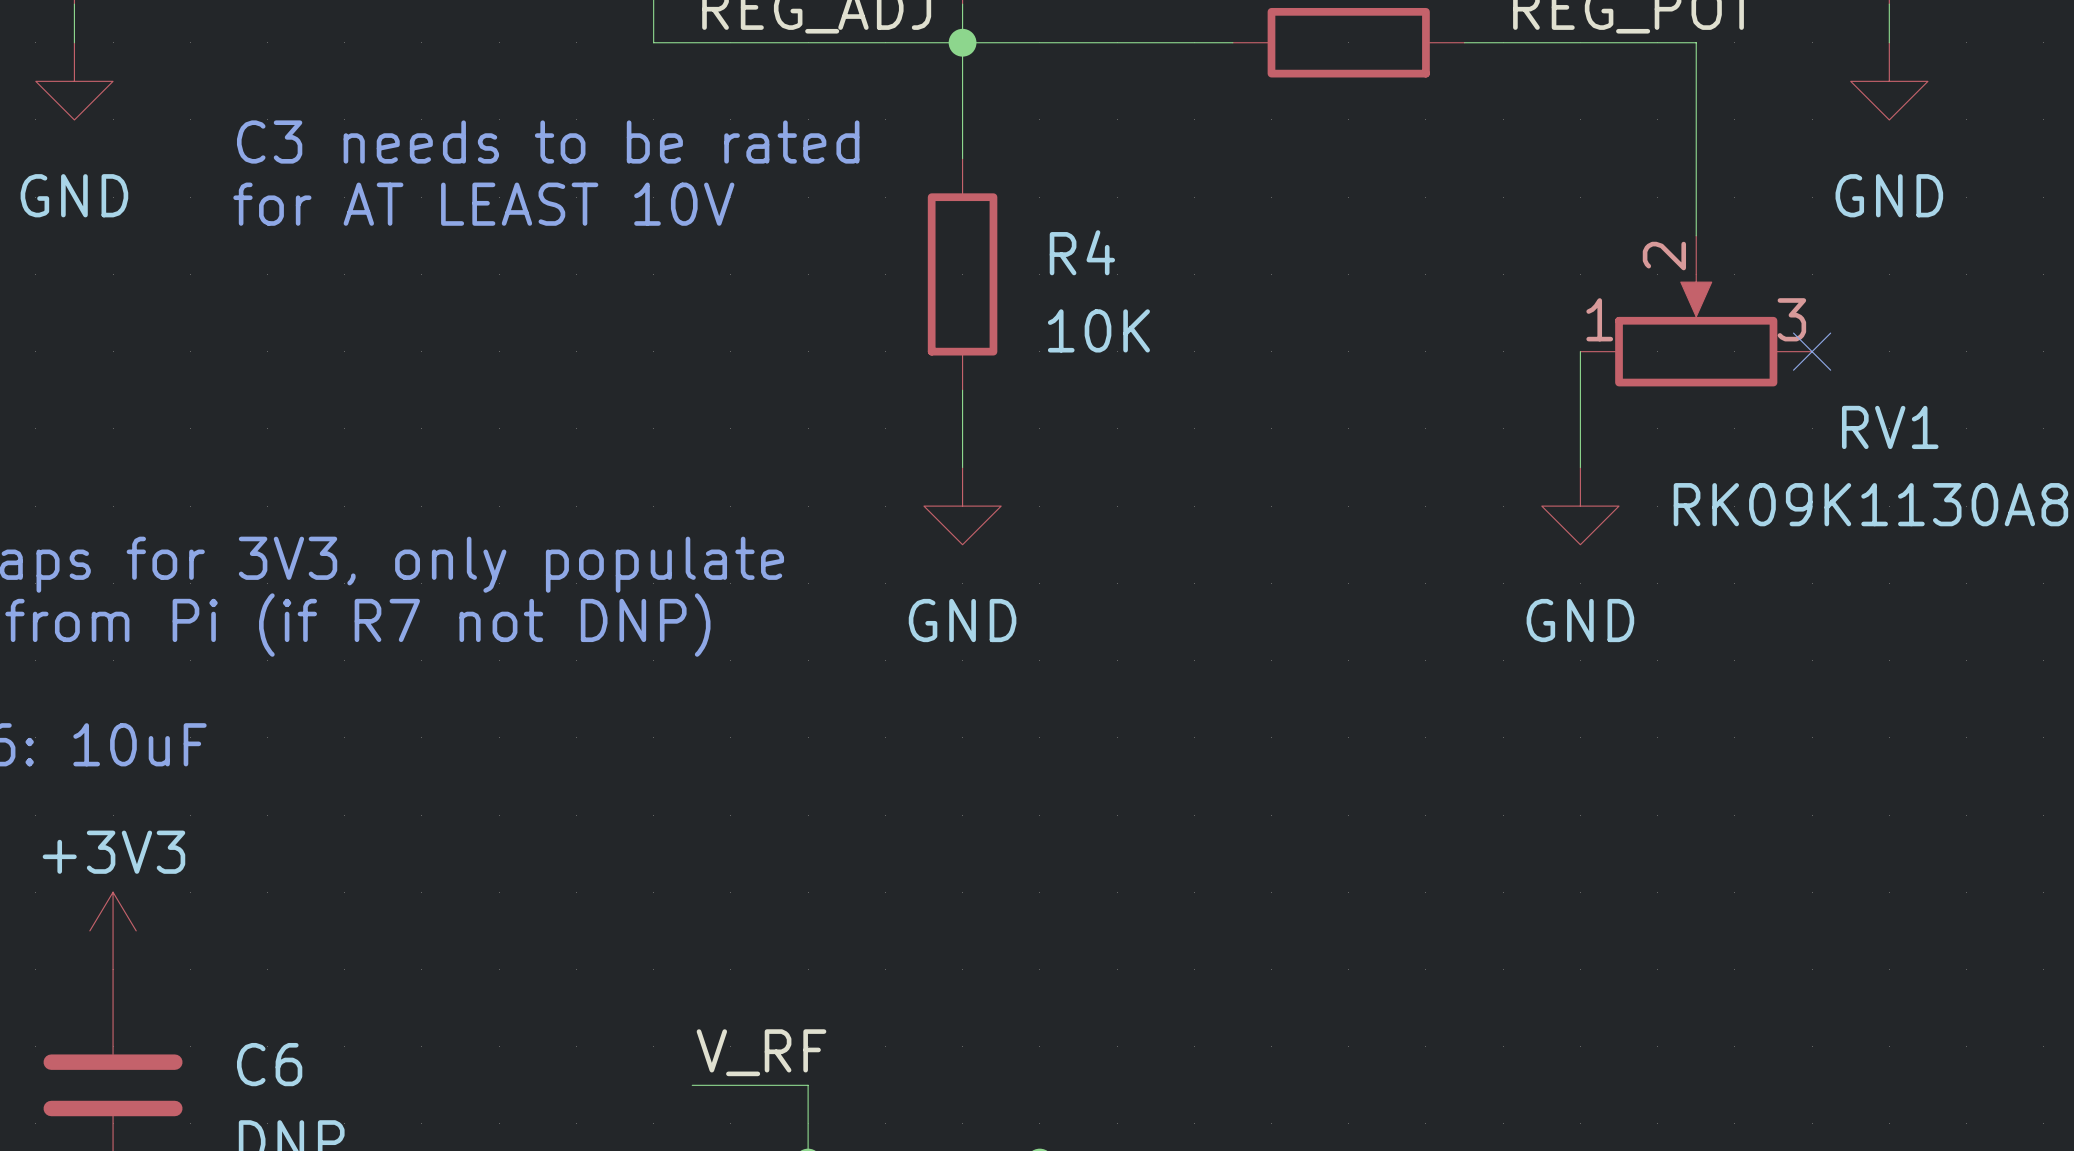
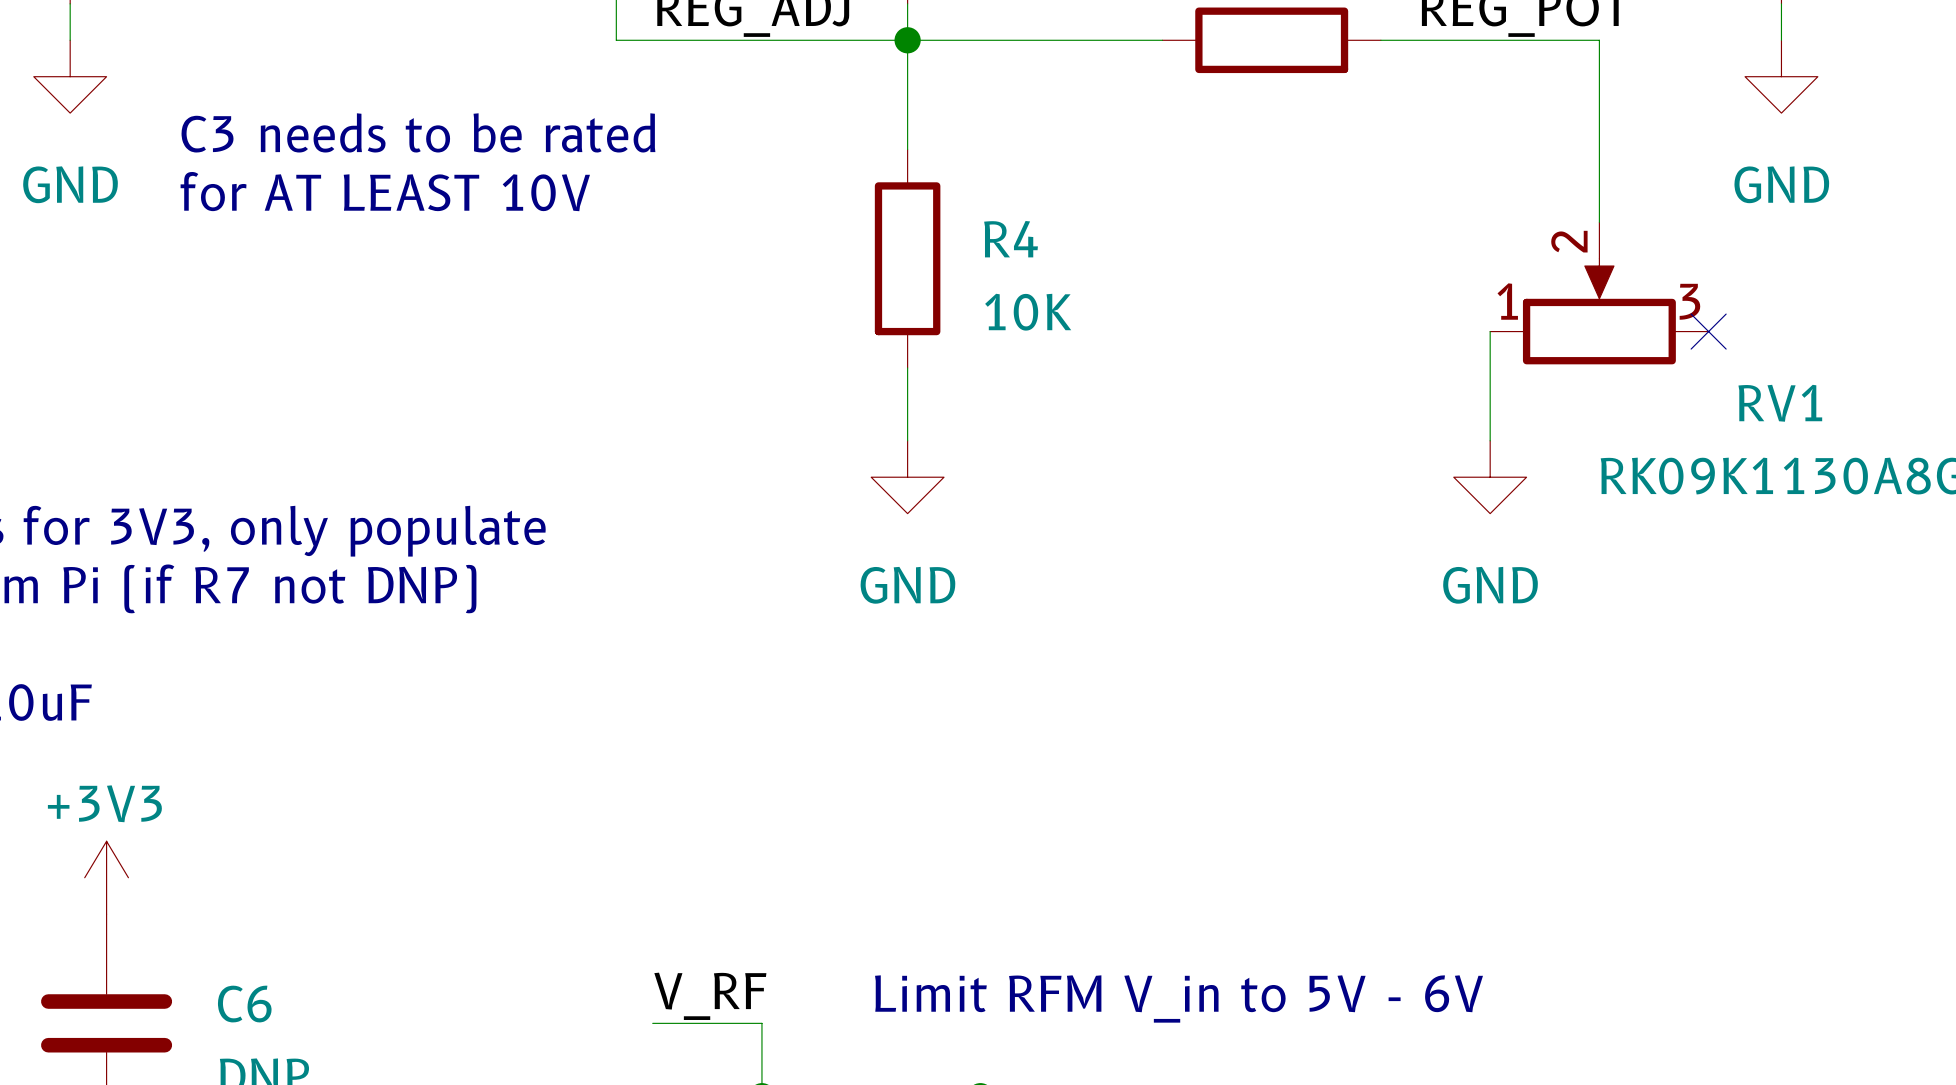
text position: C3 needs to be rated (548, 142) -> C3 needs to be rated (418, 132)
text position: for AT LEAST 10V (483, 204) -> for AT LEAST 10V (385, 191)
text: none -> Limit RFM V_in to 5V - 6V (1179, 998)

